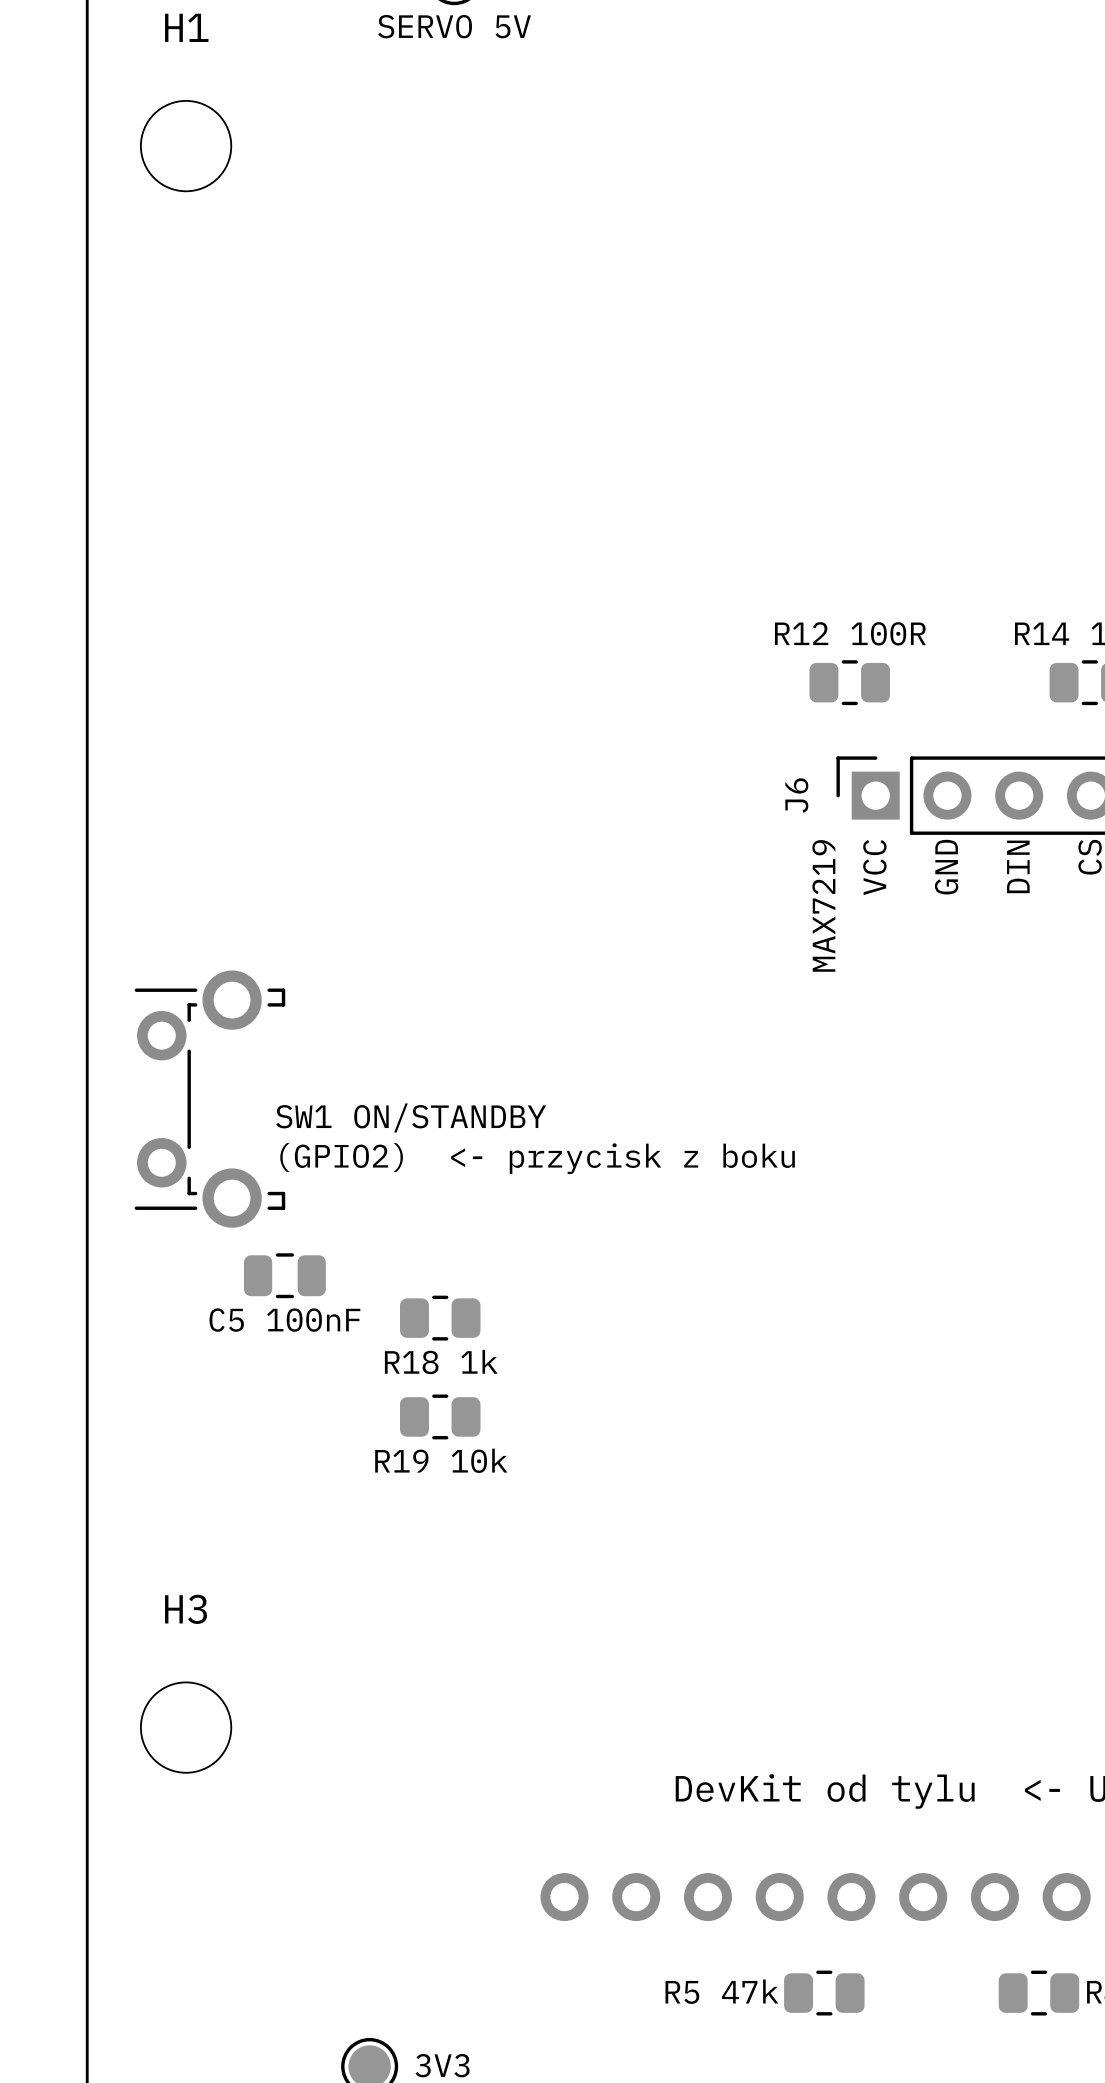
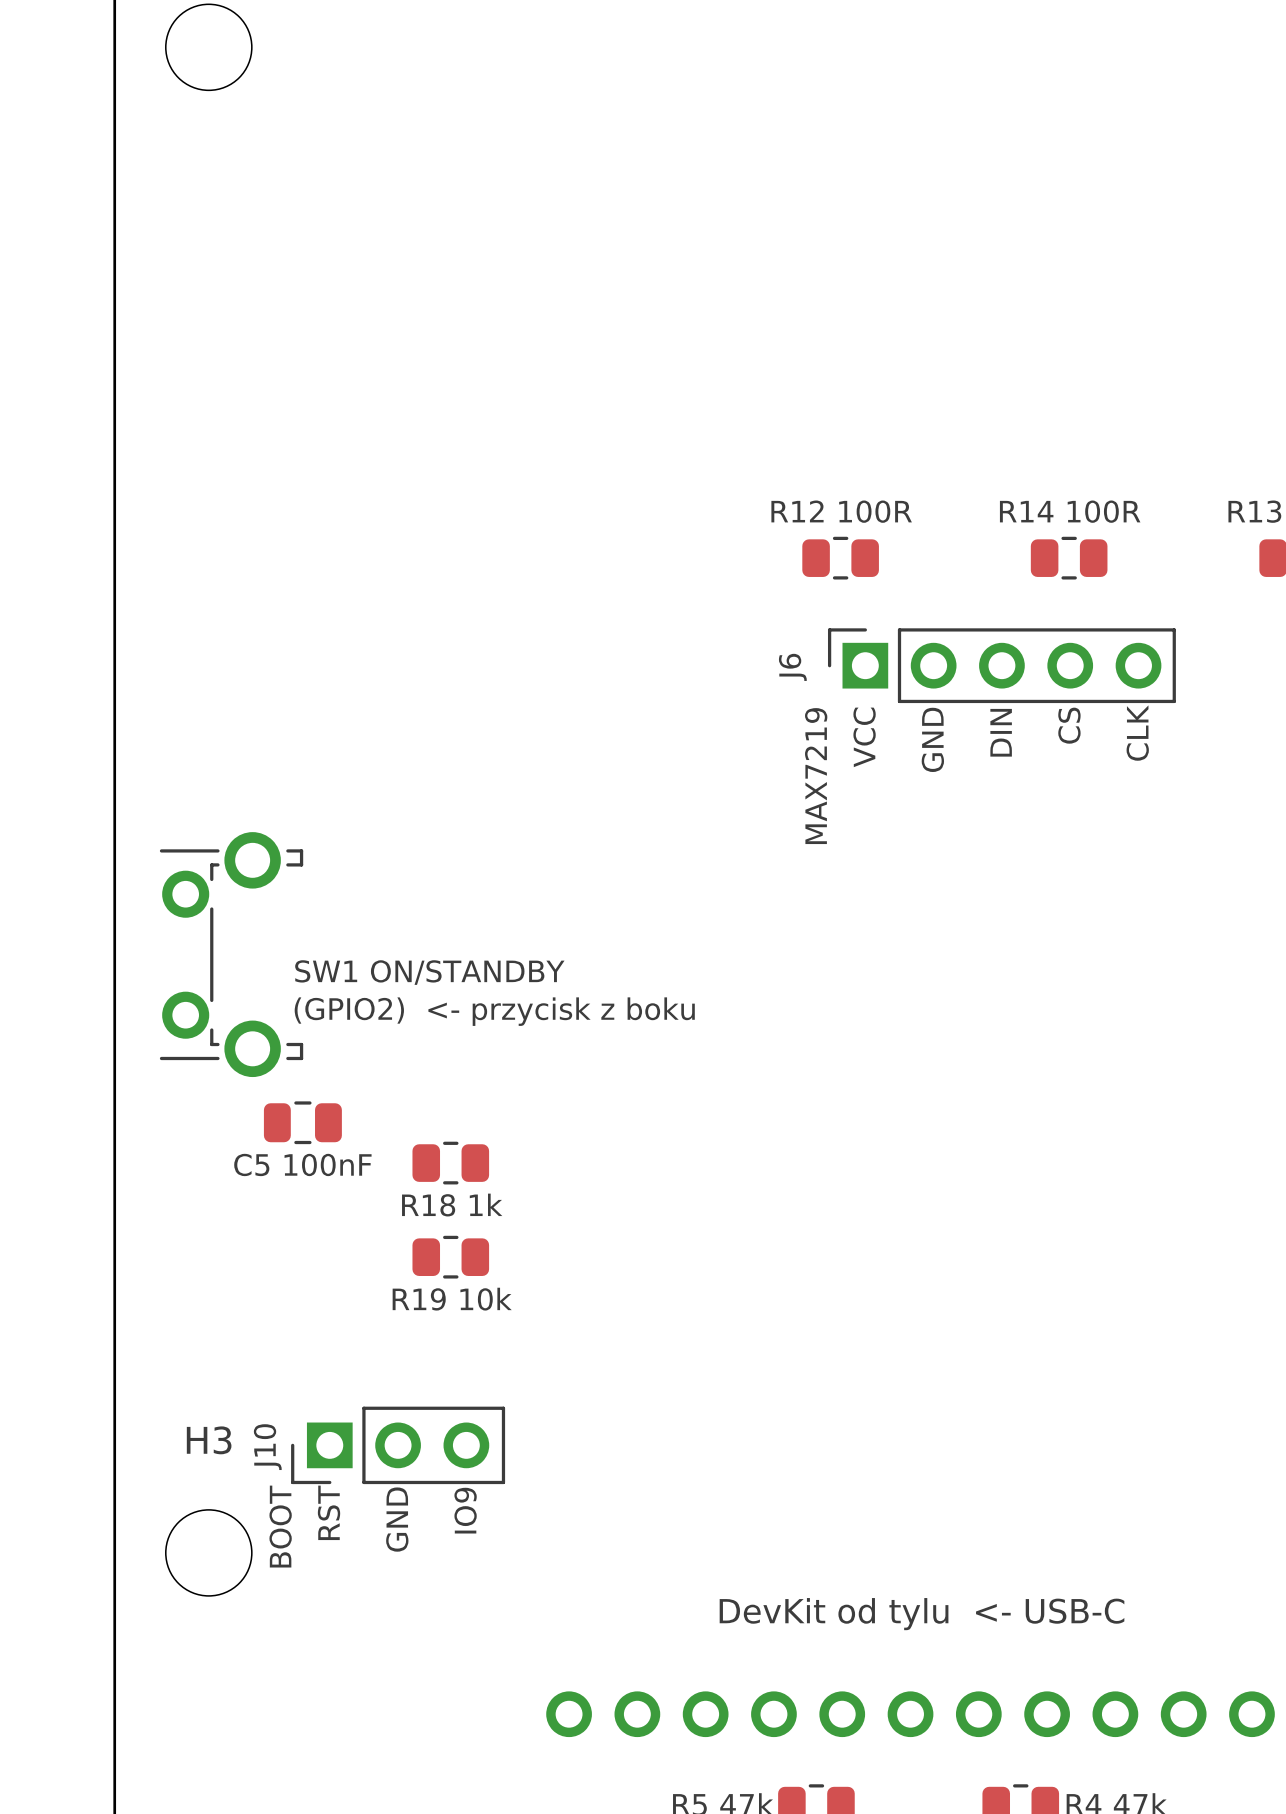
J10: none -> (398, 1445)
text: none -> RST (329, 1512)
text: none -> IO9 (465, 1510)
text: none -> GND (397, 1519)
text: none -> BOOT (280, 1526)

